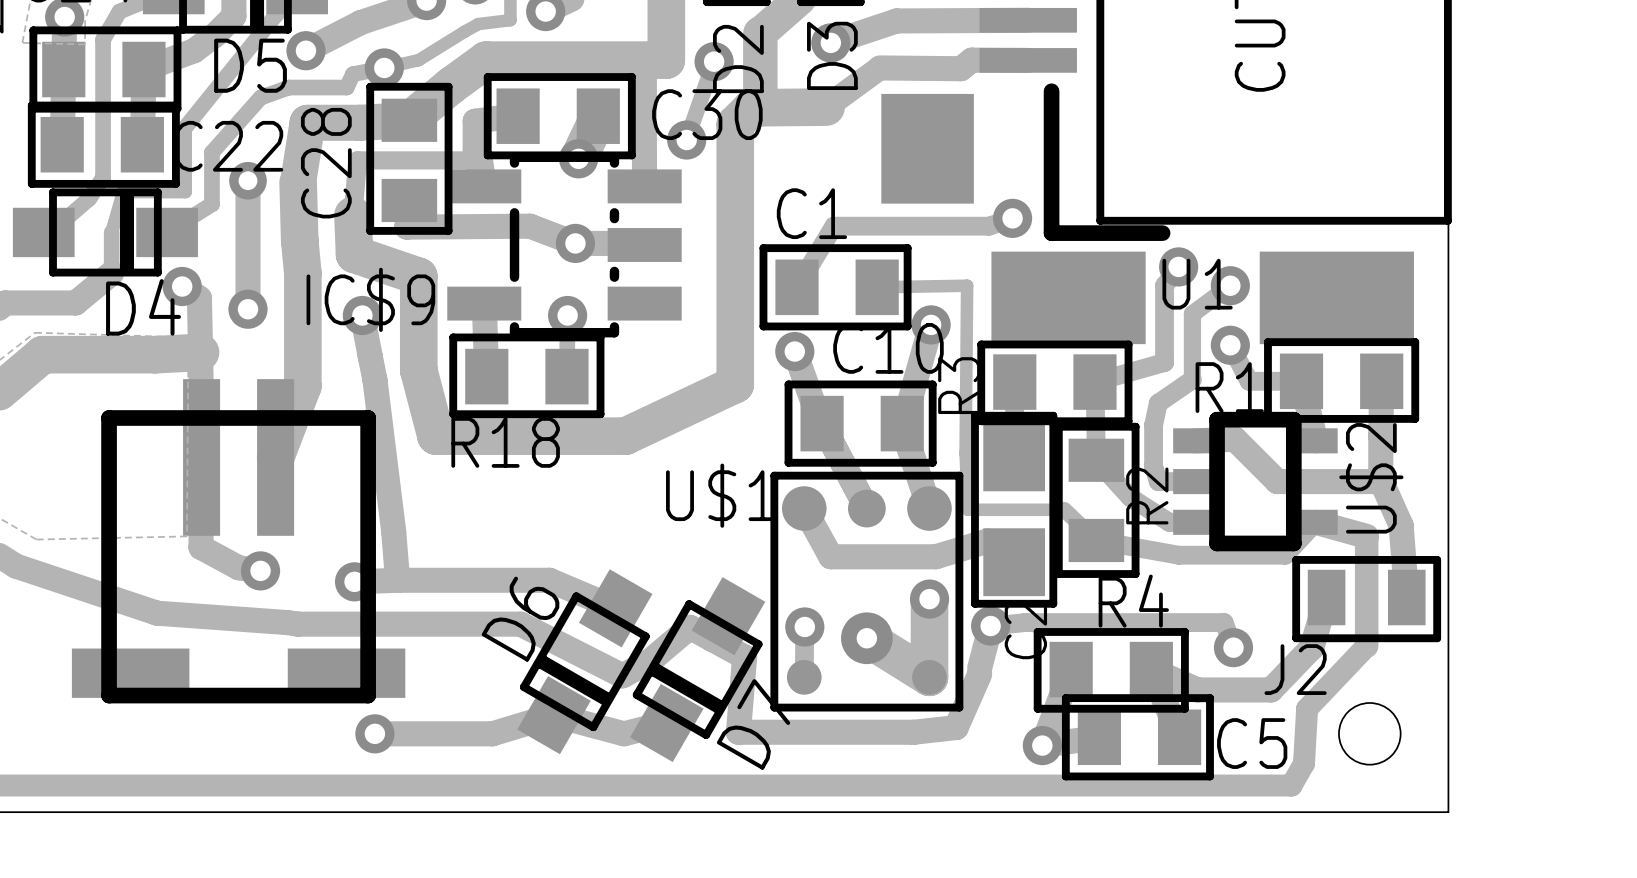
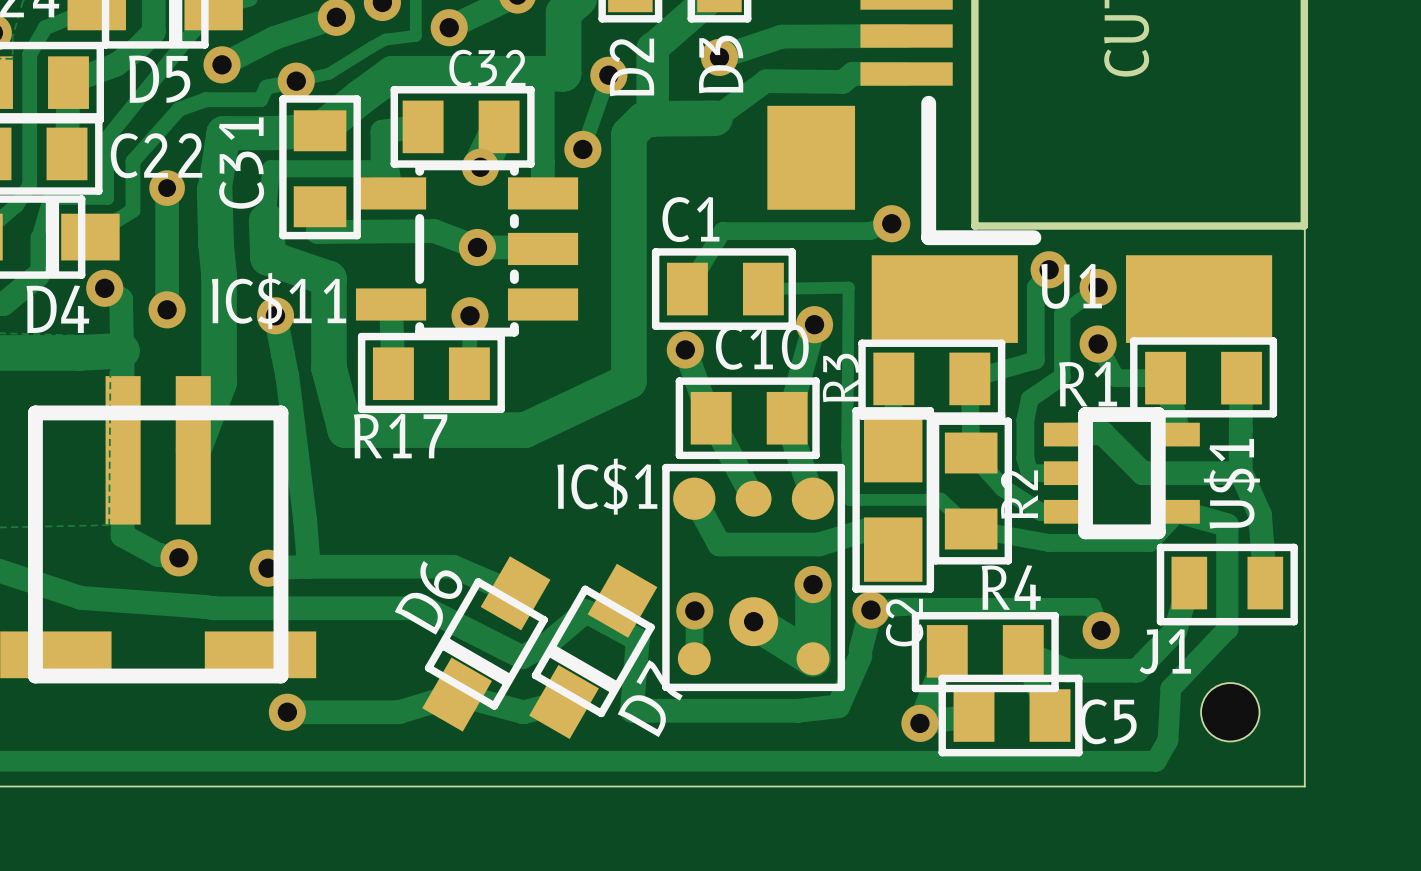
C30 name: C30 (707, 114) -> C32 (487, 68)
C28 name: C28 (326, 163) -> C31 (241, 163)
IC$9 name: IC$9 (370, 299) -> IC$11 (278, 300)
R18 name: R18 (505, 442) -> R17 (400, 436)
U$2 name: U$2 (1371, 478) -> U$1 (1231, 483)
U$1 name: U$1 (721, 495) -> IC$1 (607, 486)
J2 name: J2 (1295, 669) -> J1 (1165, 651)

